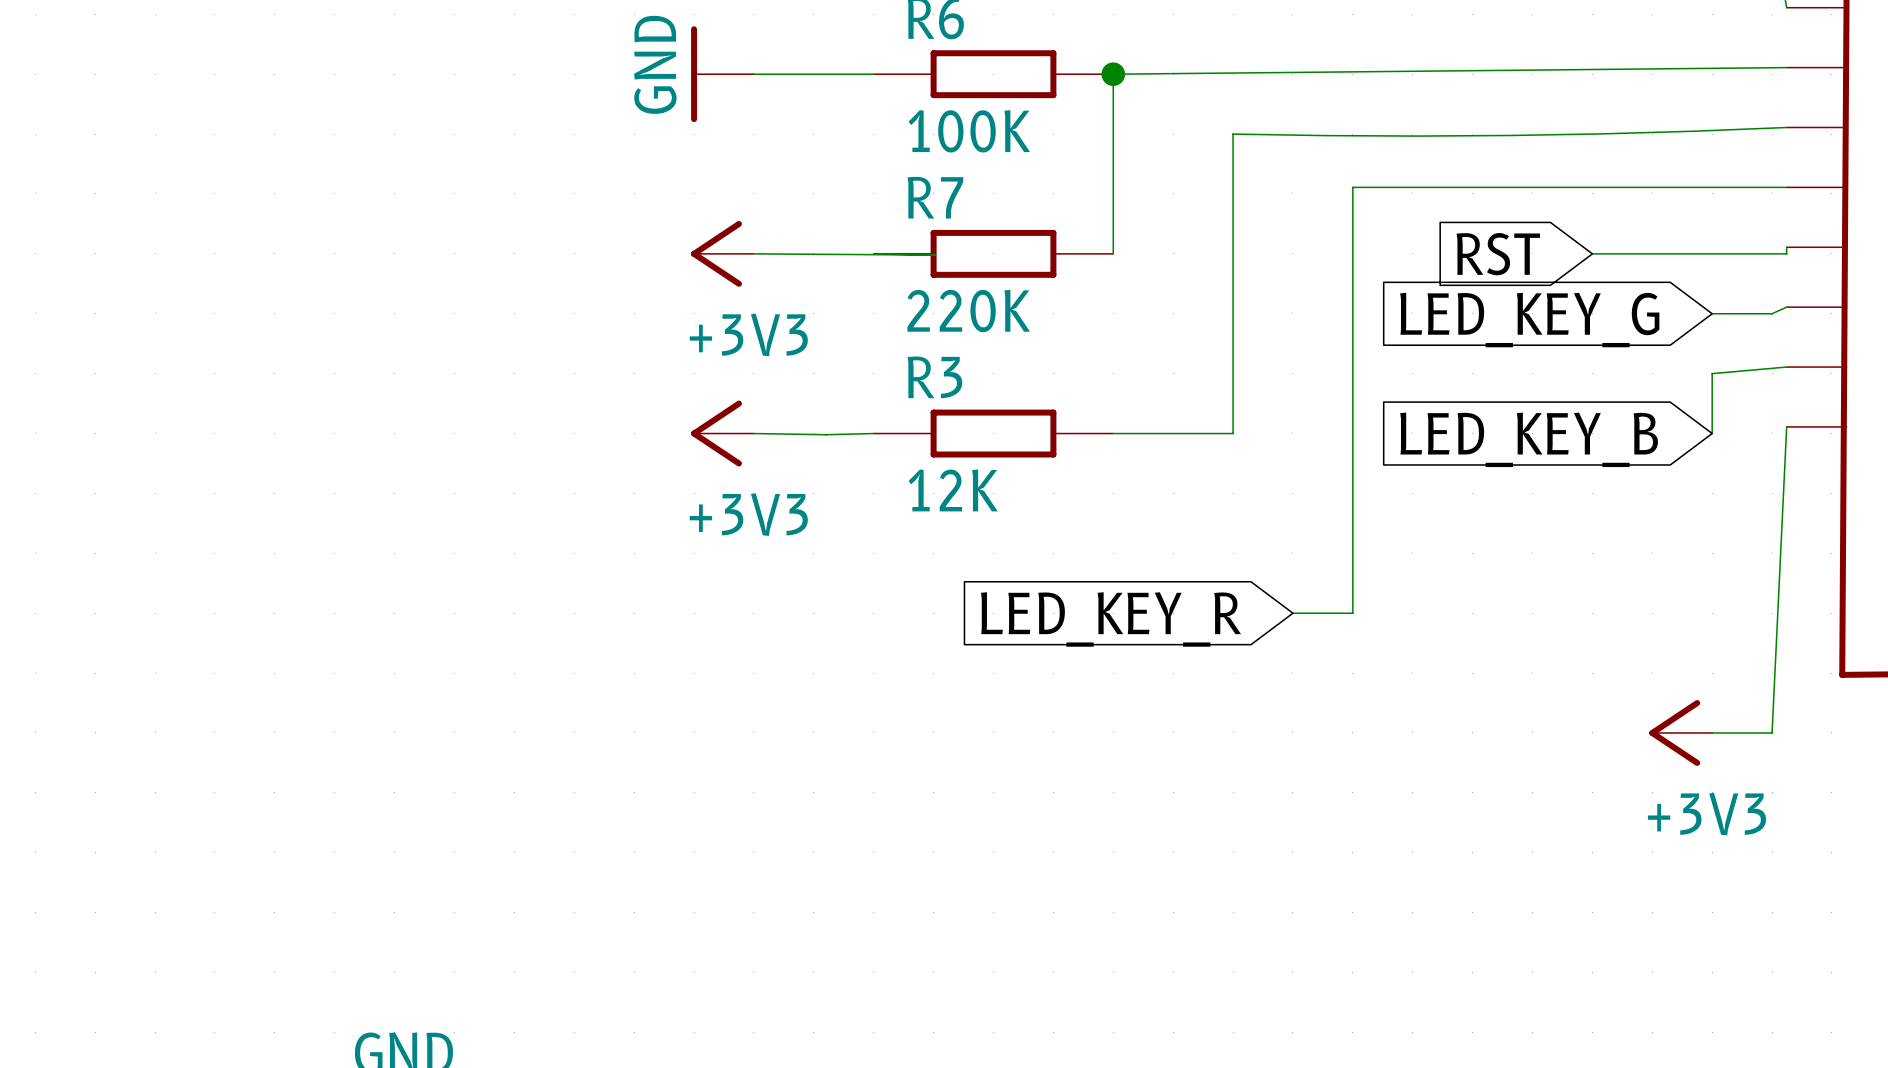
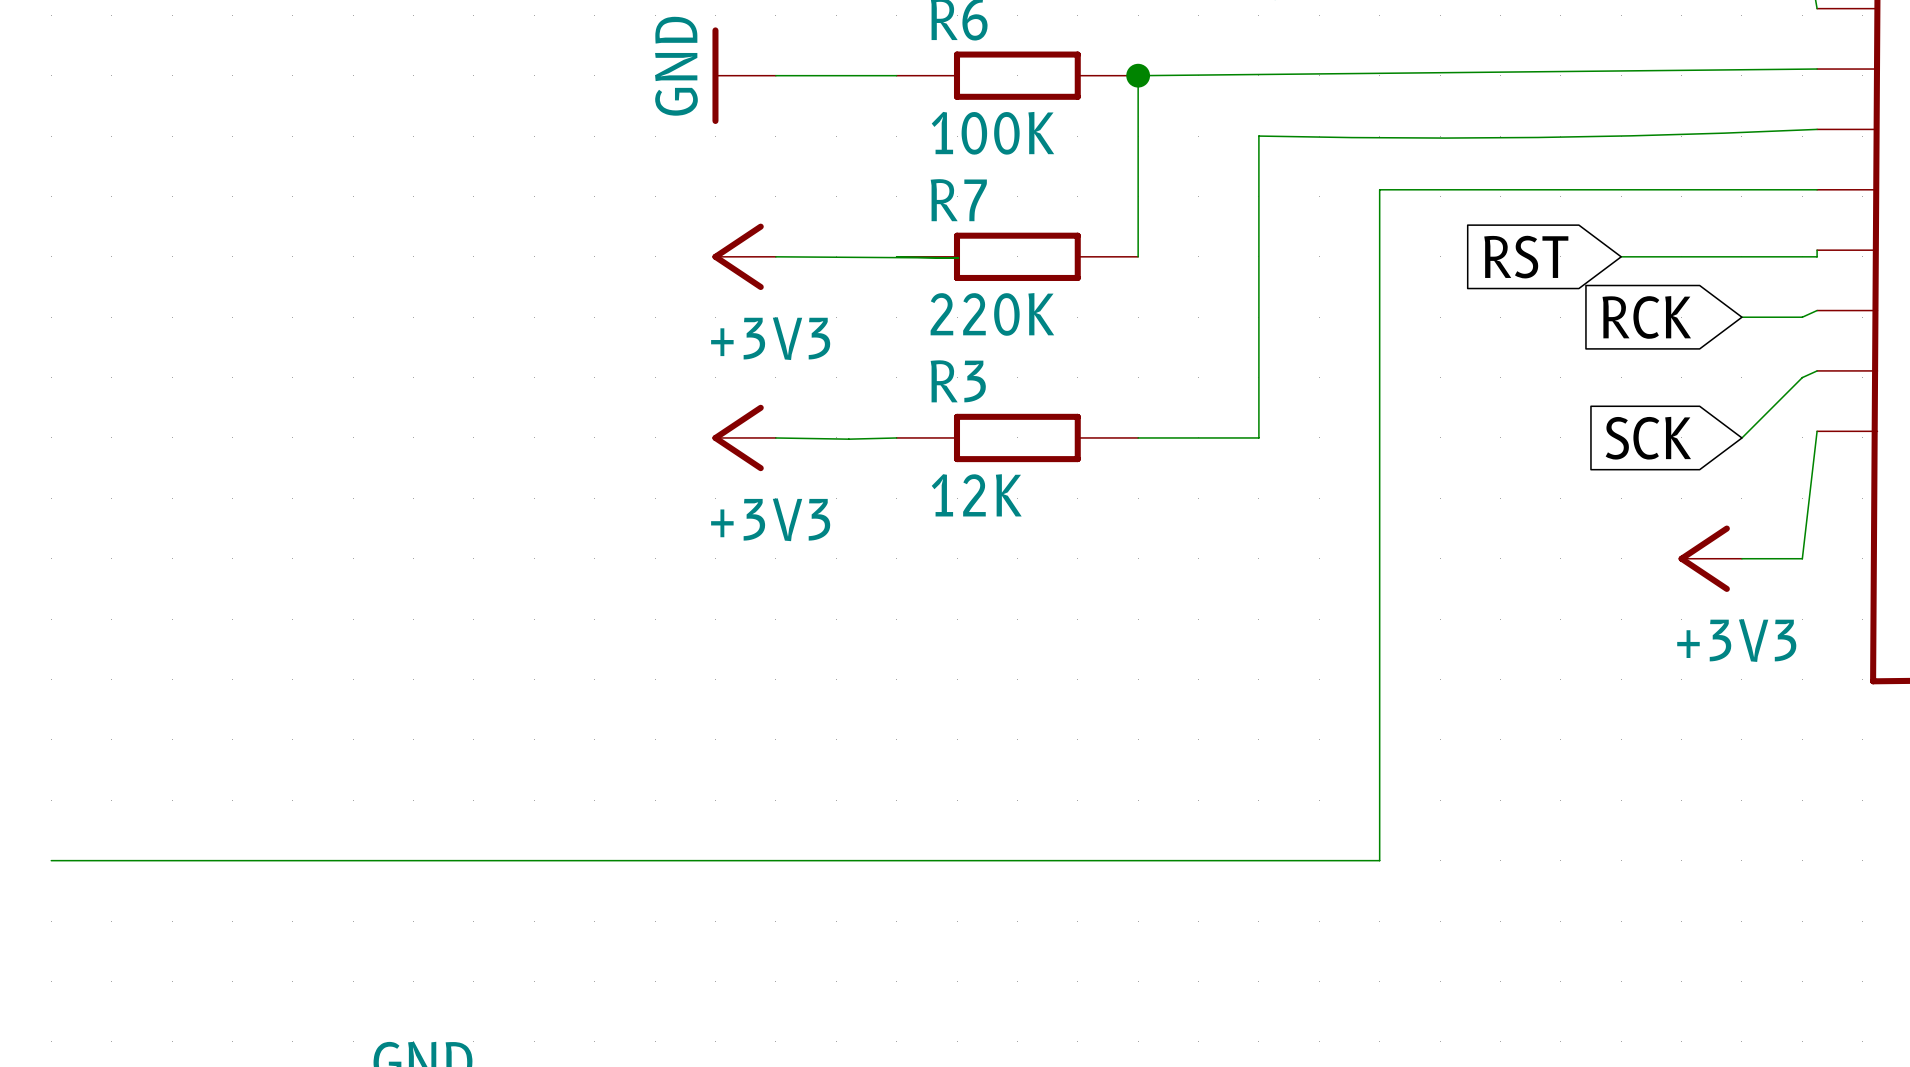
global label: LED_KEY_G (1529, 320) -> RCK (1646, 317)
wire: (1786, 367) (1712, 373) (1712, 433) -> (1817, 370) (1802, 377) (1741, 437)
wire: (1786, 426) (1772, 732) (1712, 732) -> (1817, 431) (1802, 558) (1741, 558)
global label: LED_KEY_B (1529, 439) -> SCK (1648, 438)
wire: (1292, 613) (1352, 613) -> (51, 860) (1379, 860) (1379, 619)
global label: LED_KEY_R (1111, 619) -> none
power symbol position: +3V3 (1680, 732) -> +3V3 (1710, 558)

